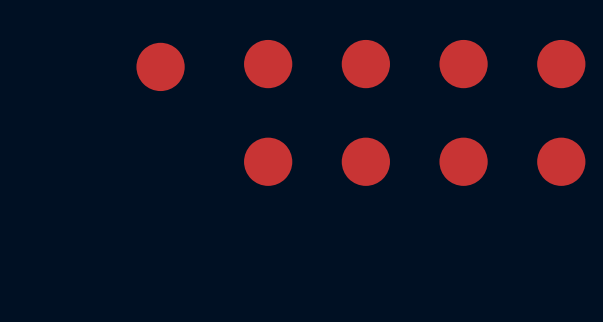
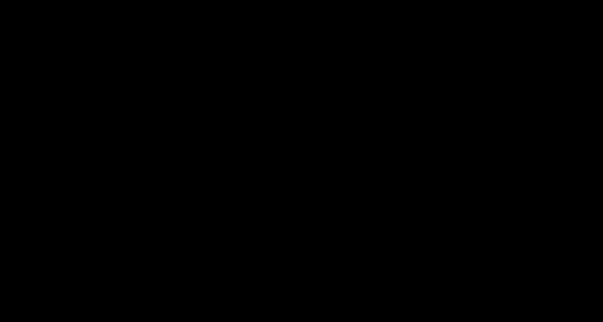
part: (268, 64) -> none
part: (365, 64) -> none
part: (463, 64) -> none
part: (561, 64) -> none
part: (160, 66) -> none
part: (268, 161) -> none
part: (365, 161) -> none
part: (463, 161) -> none
part: (561, 161) -> none

